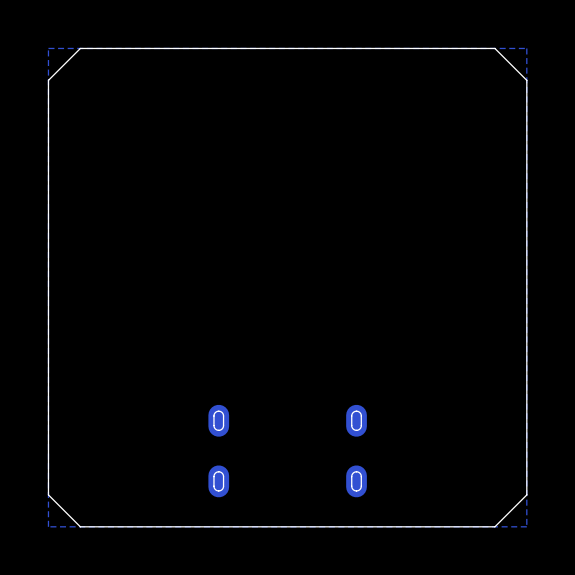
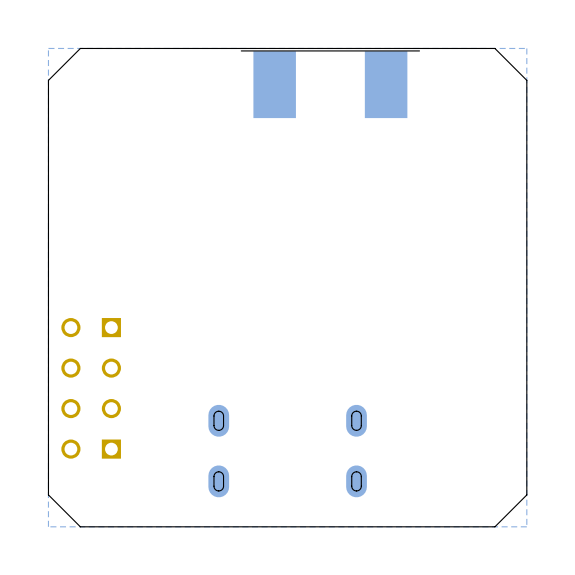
part: none -> (330, 84)
part: none -> (91, 388)

